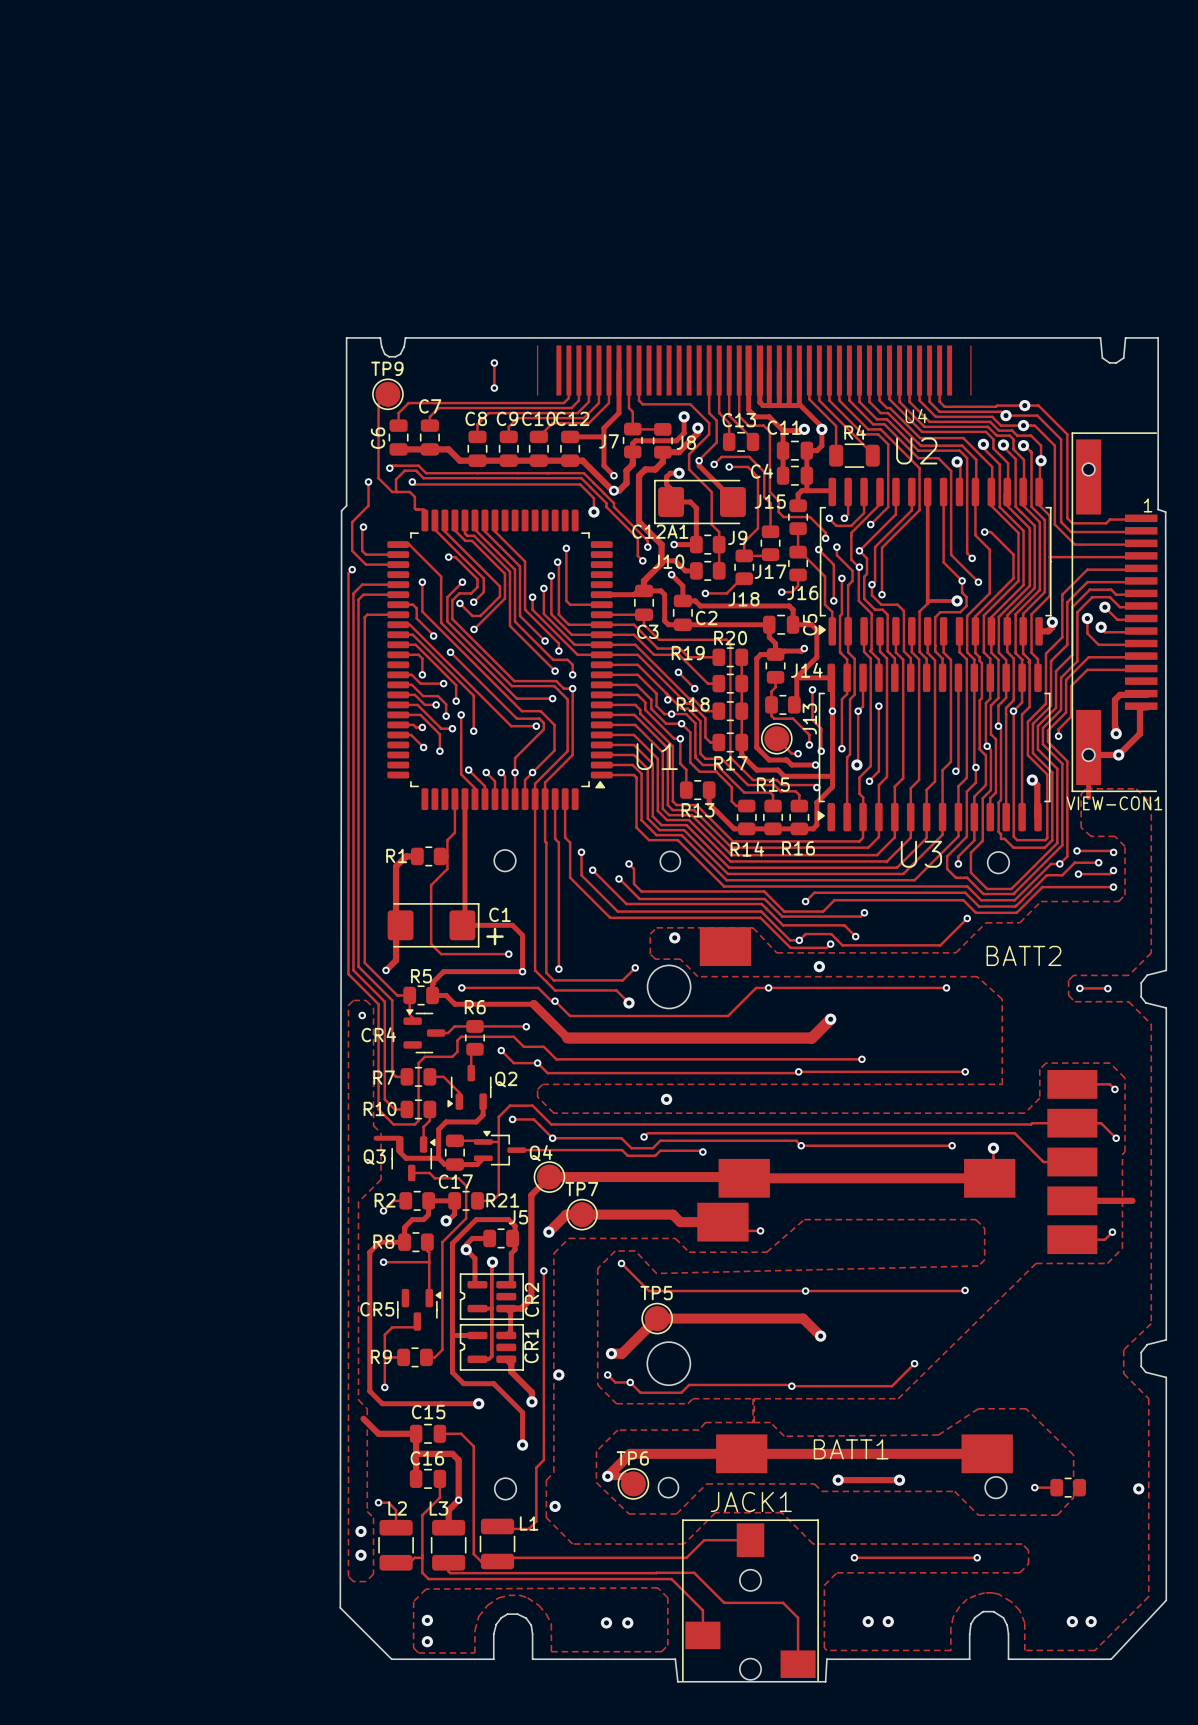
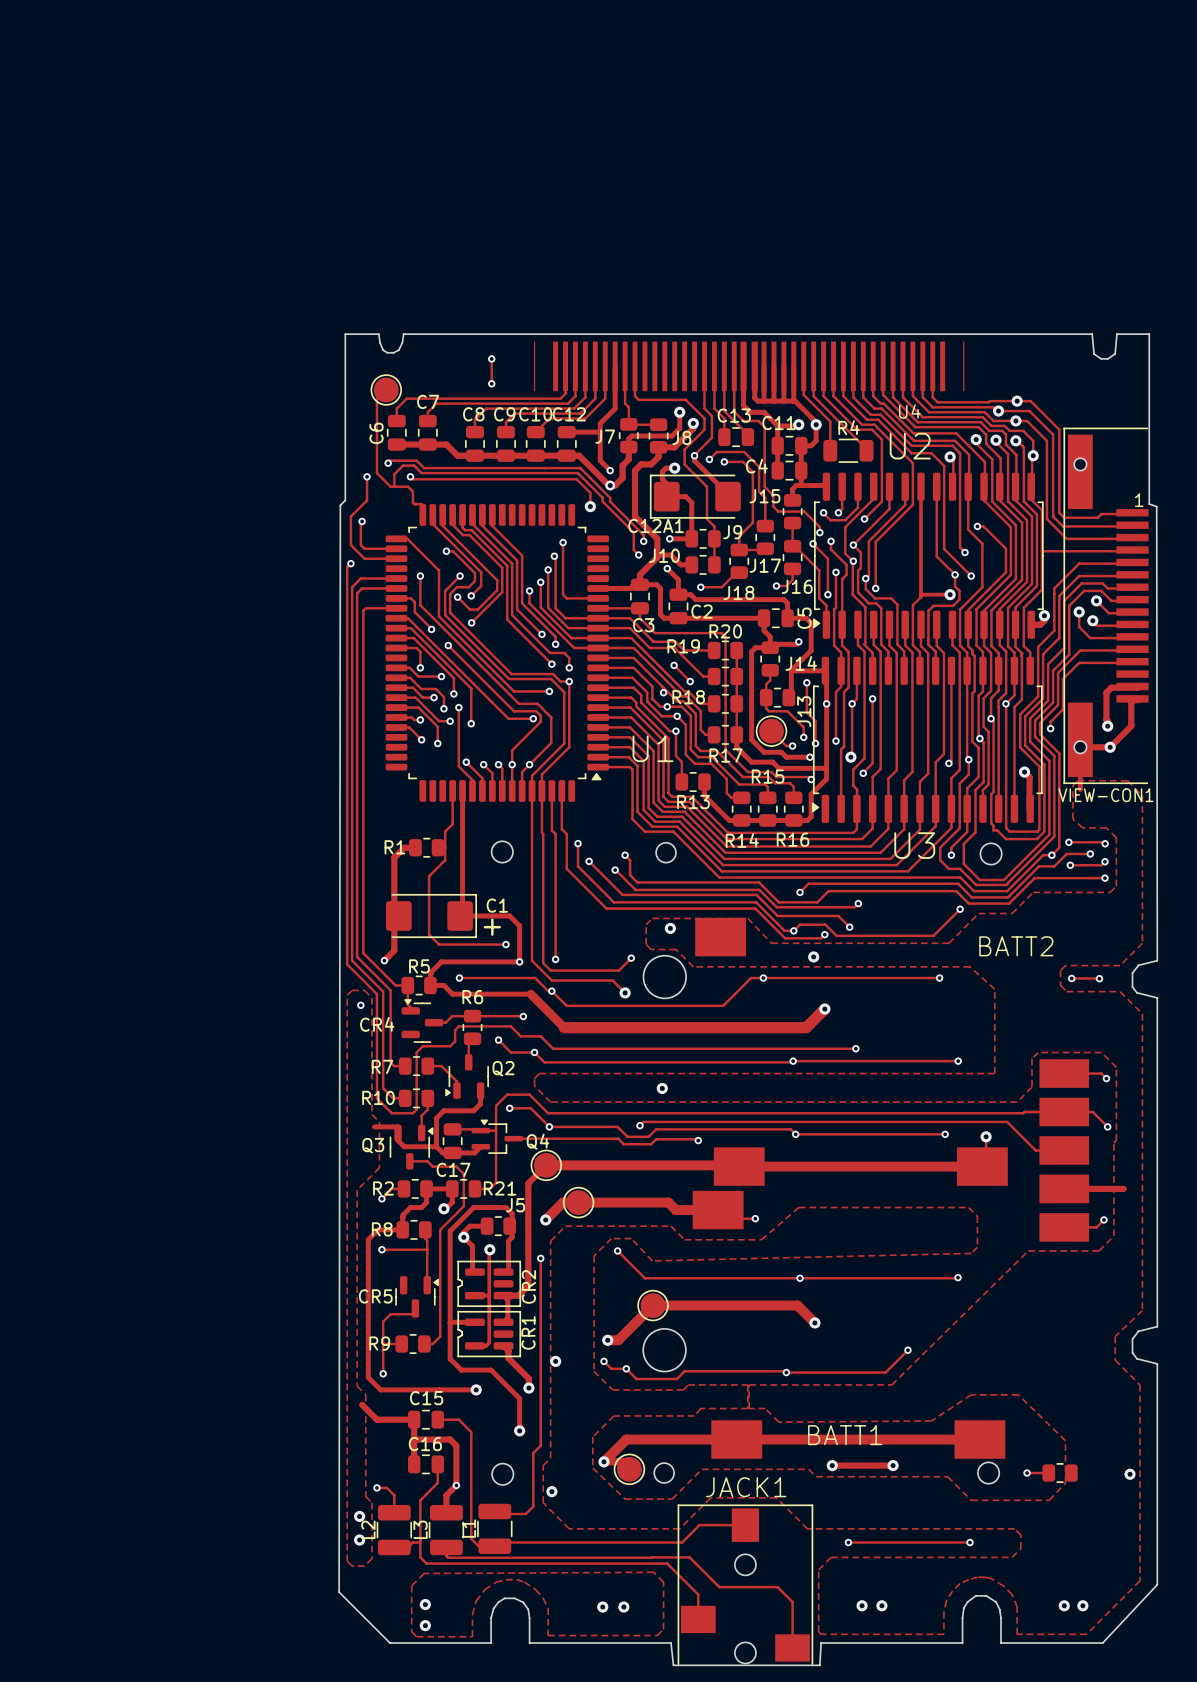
TP9 name: TP9 (387, 368) -> none
TP7 name: TP7 (581, 1189) -> none
TP5 name: TP5 (656, 1293) -> none
TP6 name: TP6 (632, 1458) -> none
L2 name rotation: 0° (397, 1508) -> 90° counterclockwise (368, 1529)
L2 name position: L2 (397, 1508) -> L2 (368, 1529)
L3 name rotation: 0° (438, 1508) -> 90° counterclockwise (420, 1529)
L3 name position: L3 (438, 1508) -> L3 (420, 1529)
L1 name rotation: 0° (529, 1523) -> 90° counterclockwise (468, 1528)
L1 name position: L1 (529, 1523) -> L1 (468, 1528)

